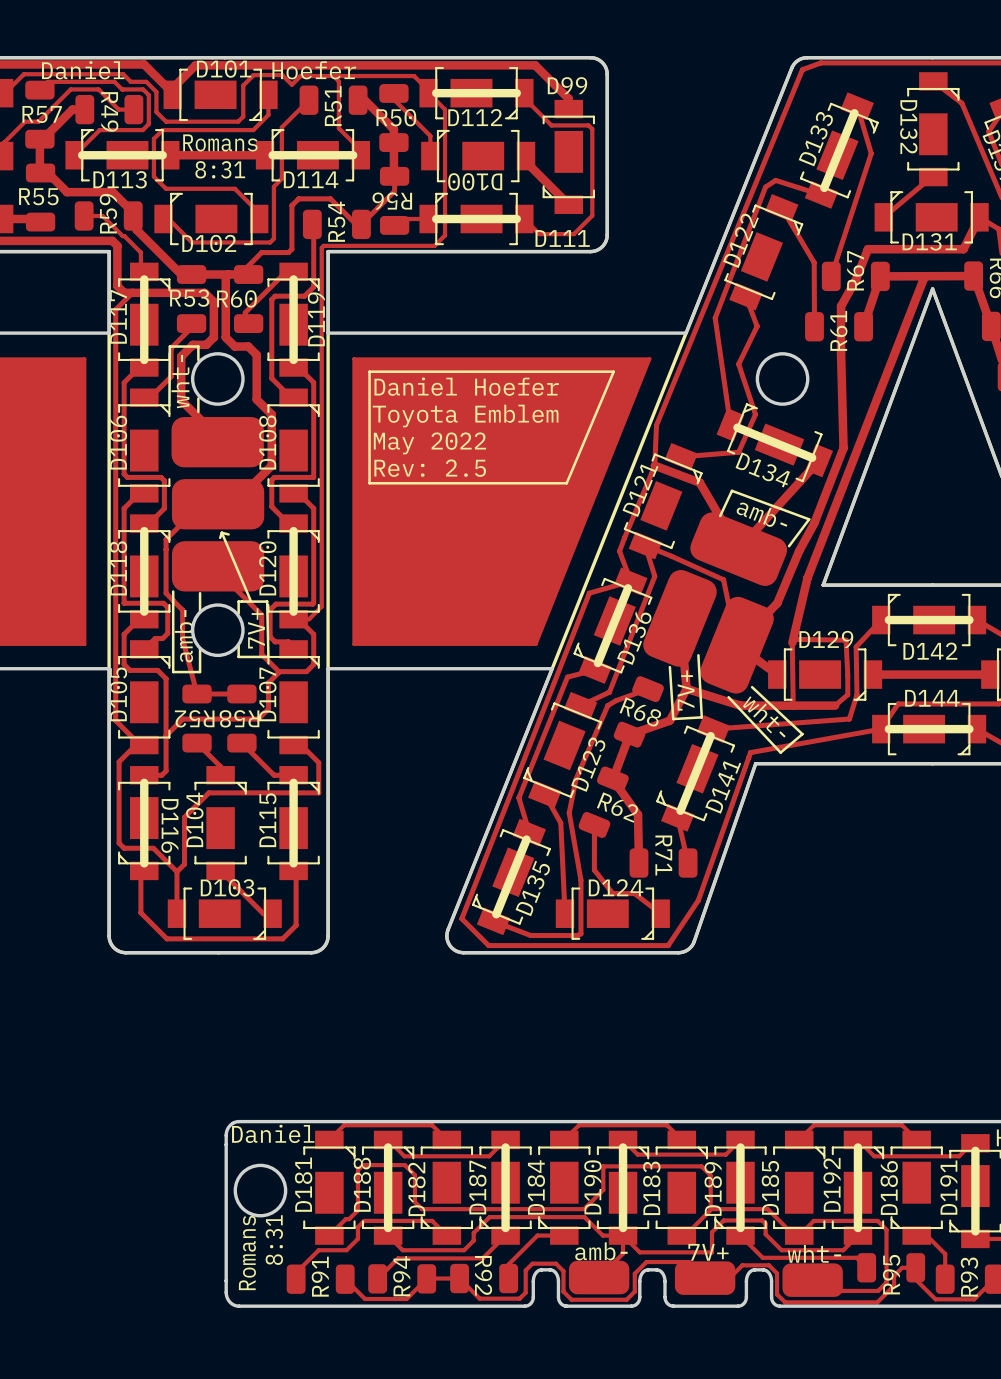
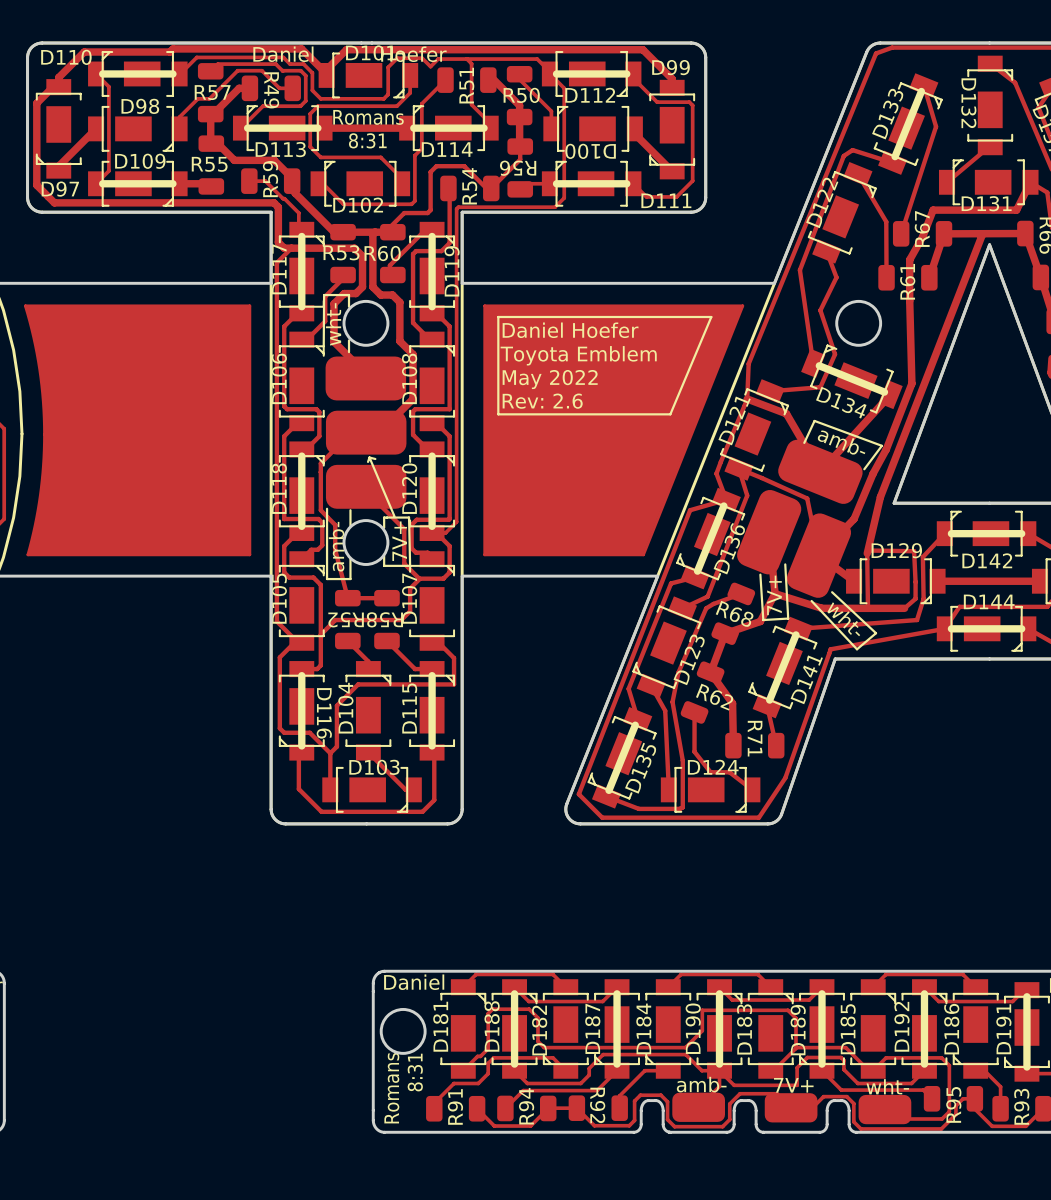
text: Rev: 2.5 (430, 468) -> Rev: 2.6 (542, 401)

